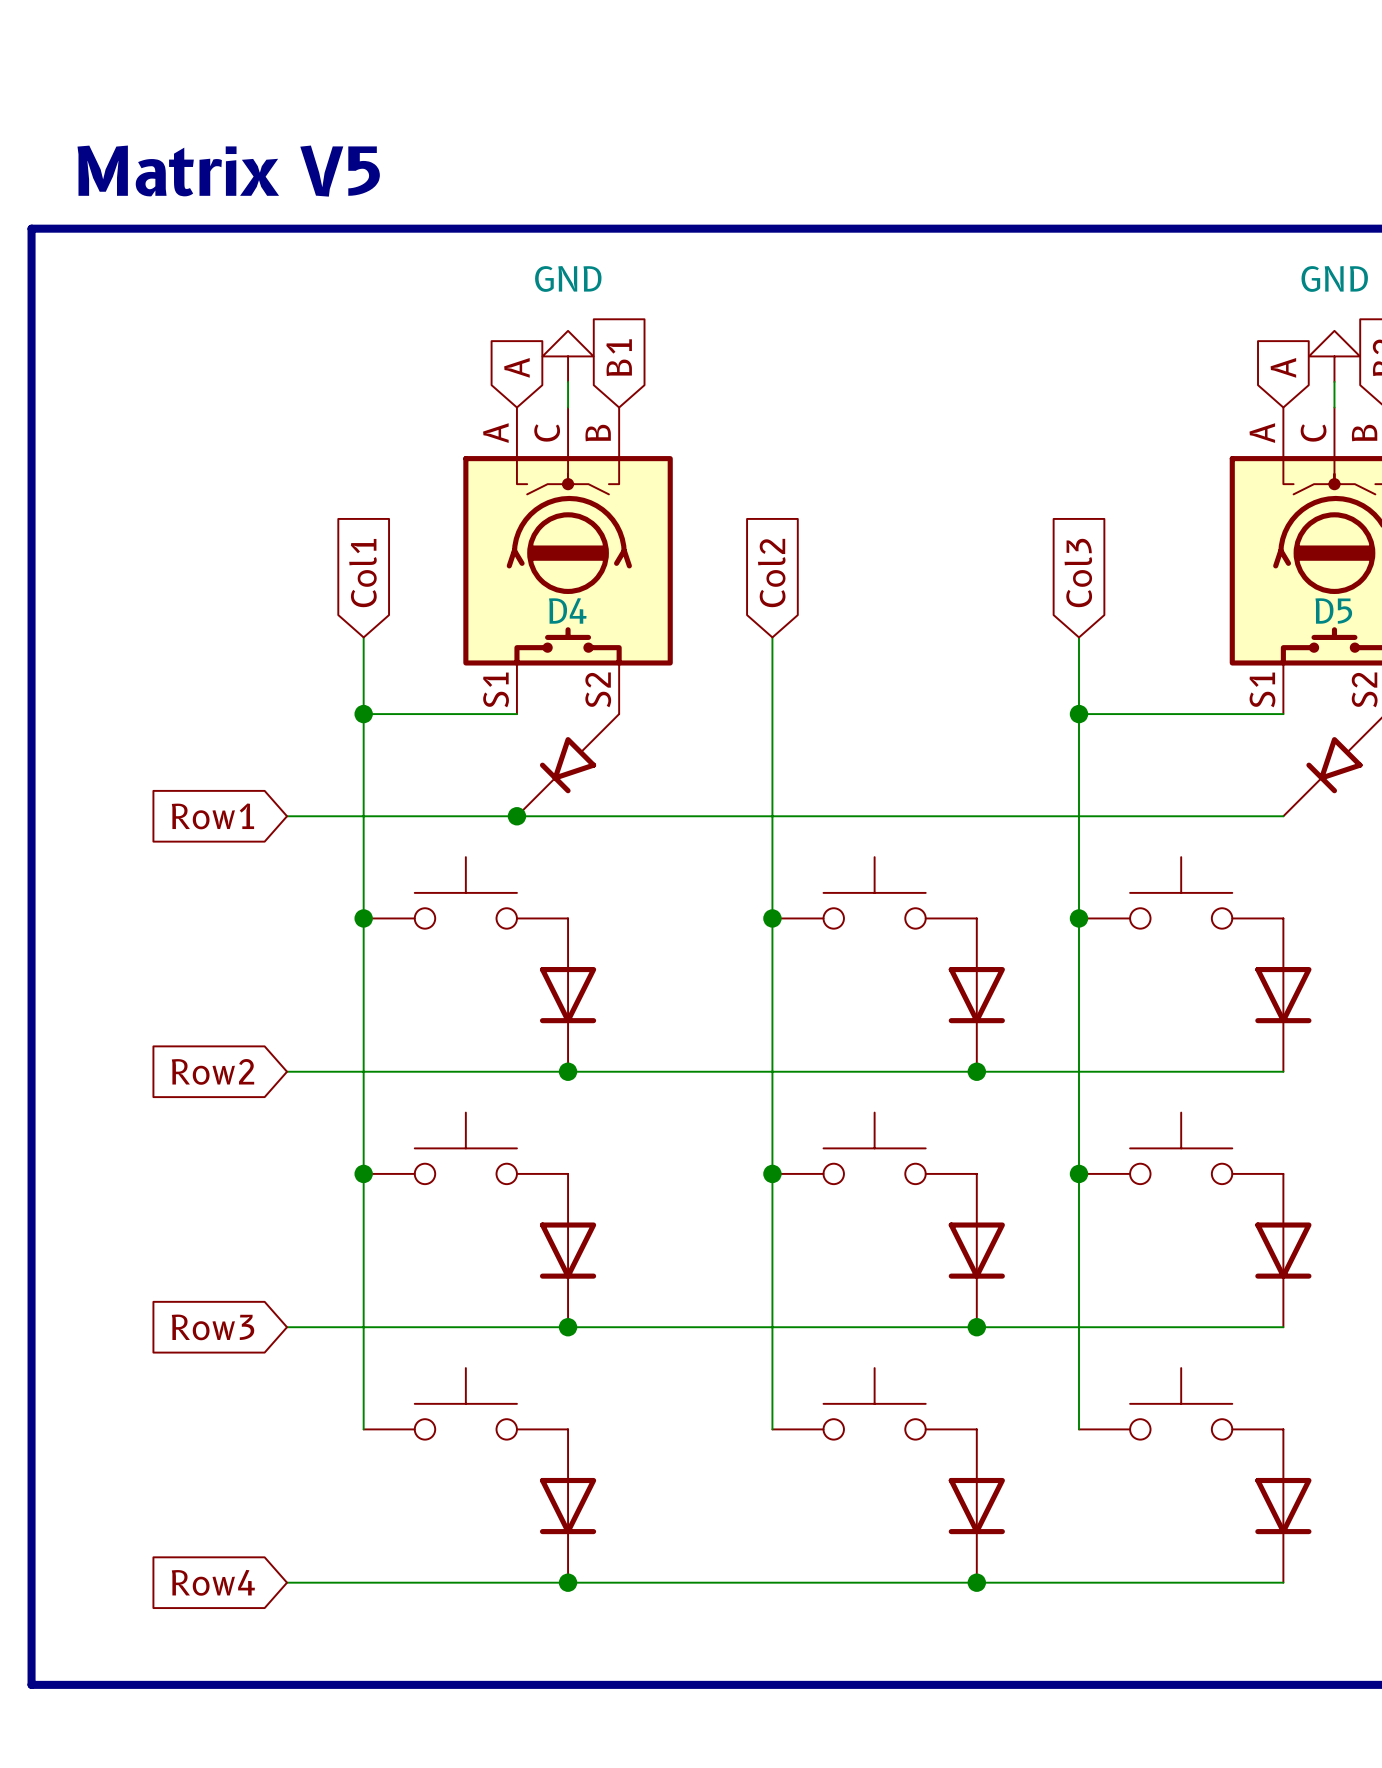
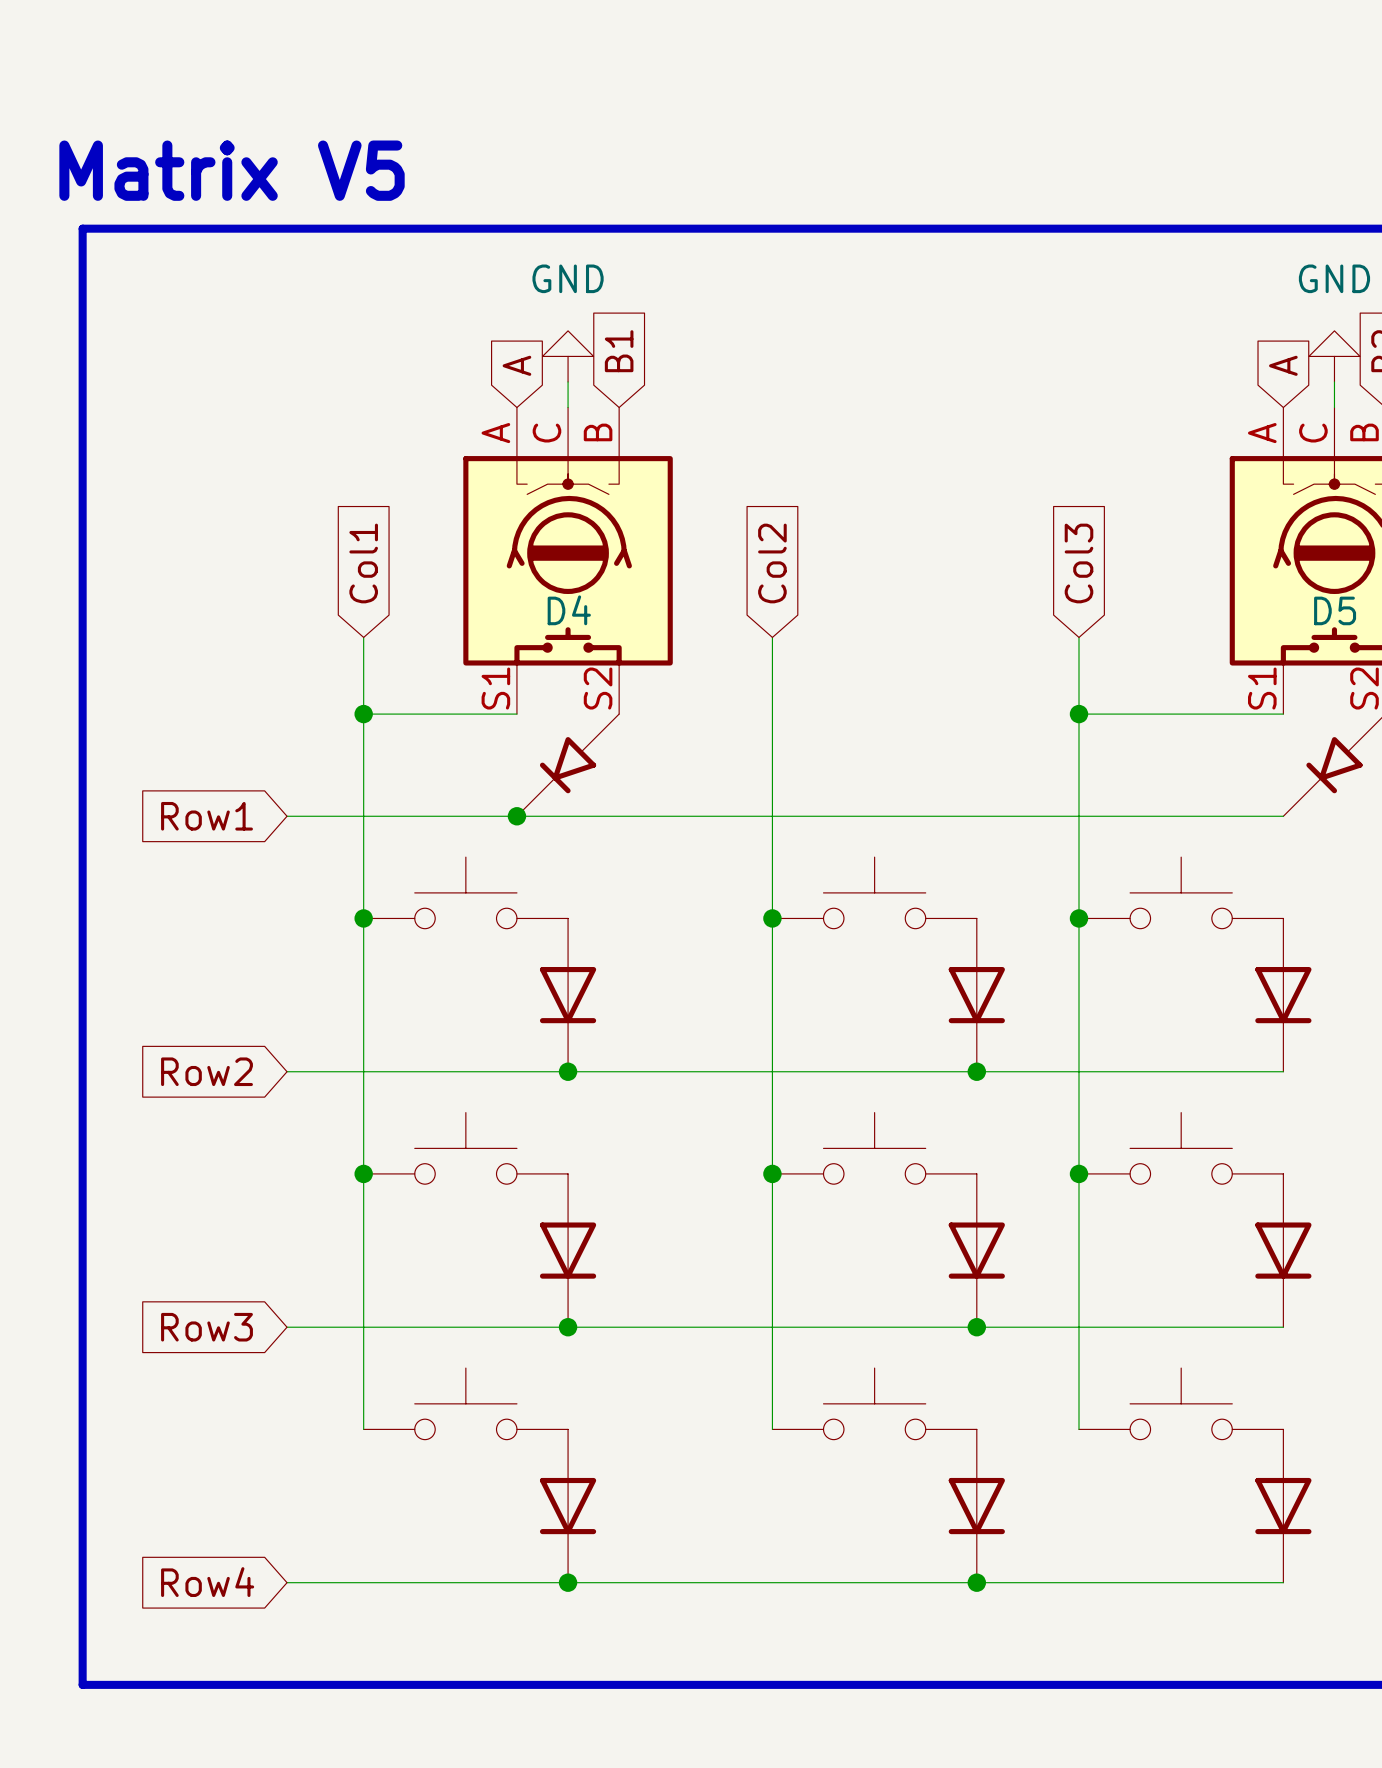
line: (82, 228) (31, 228) (31, 1684) (82, 1684) -> (82, 228) (82, 1684)

